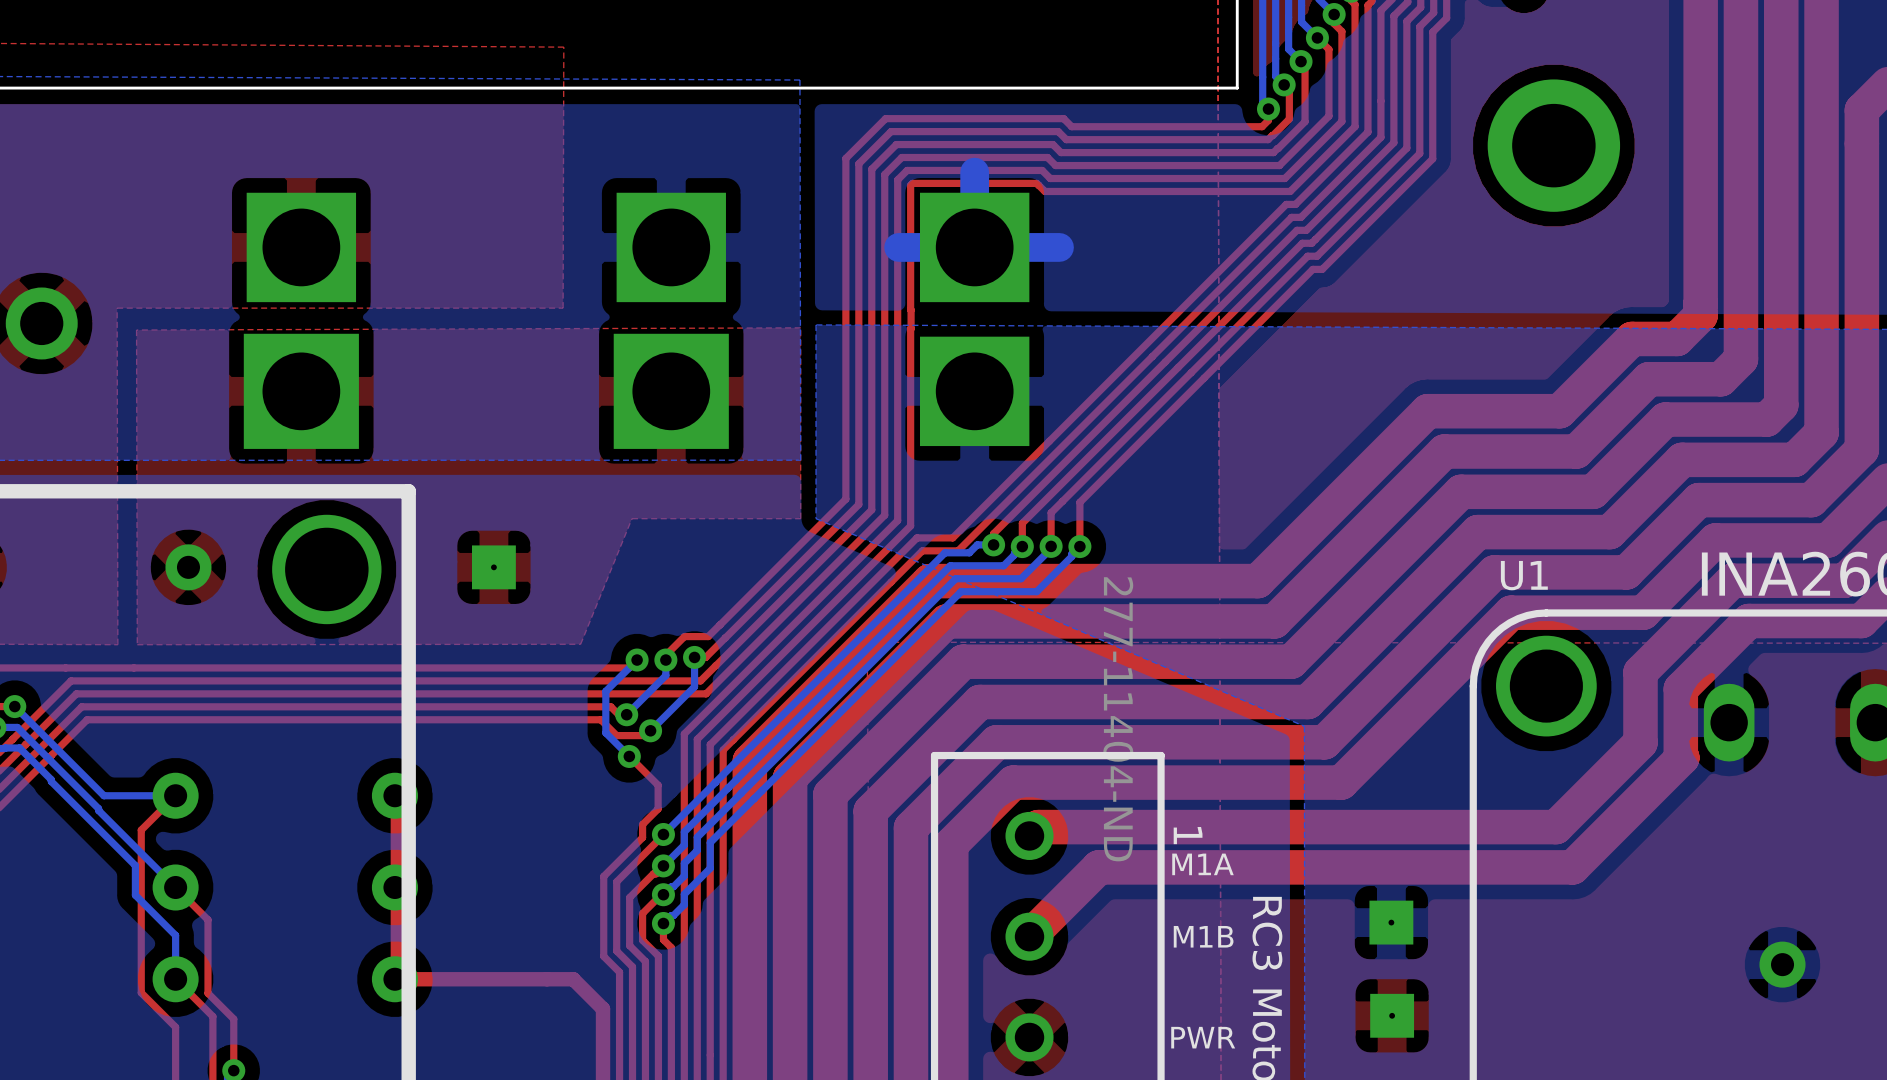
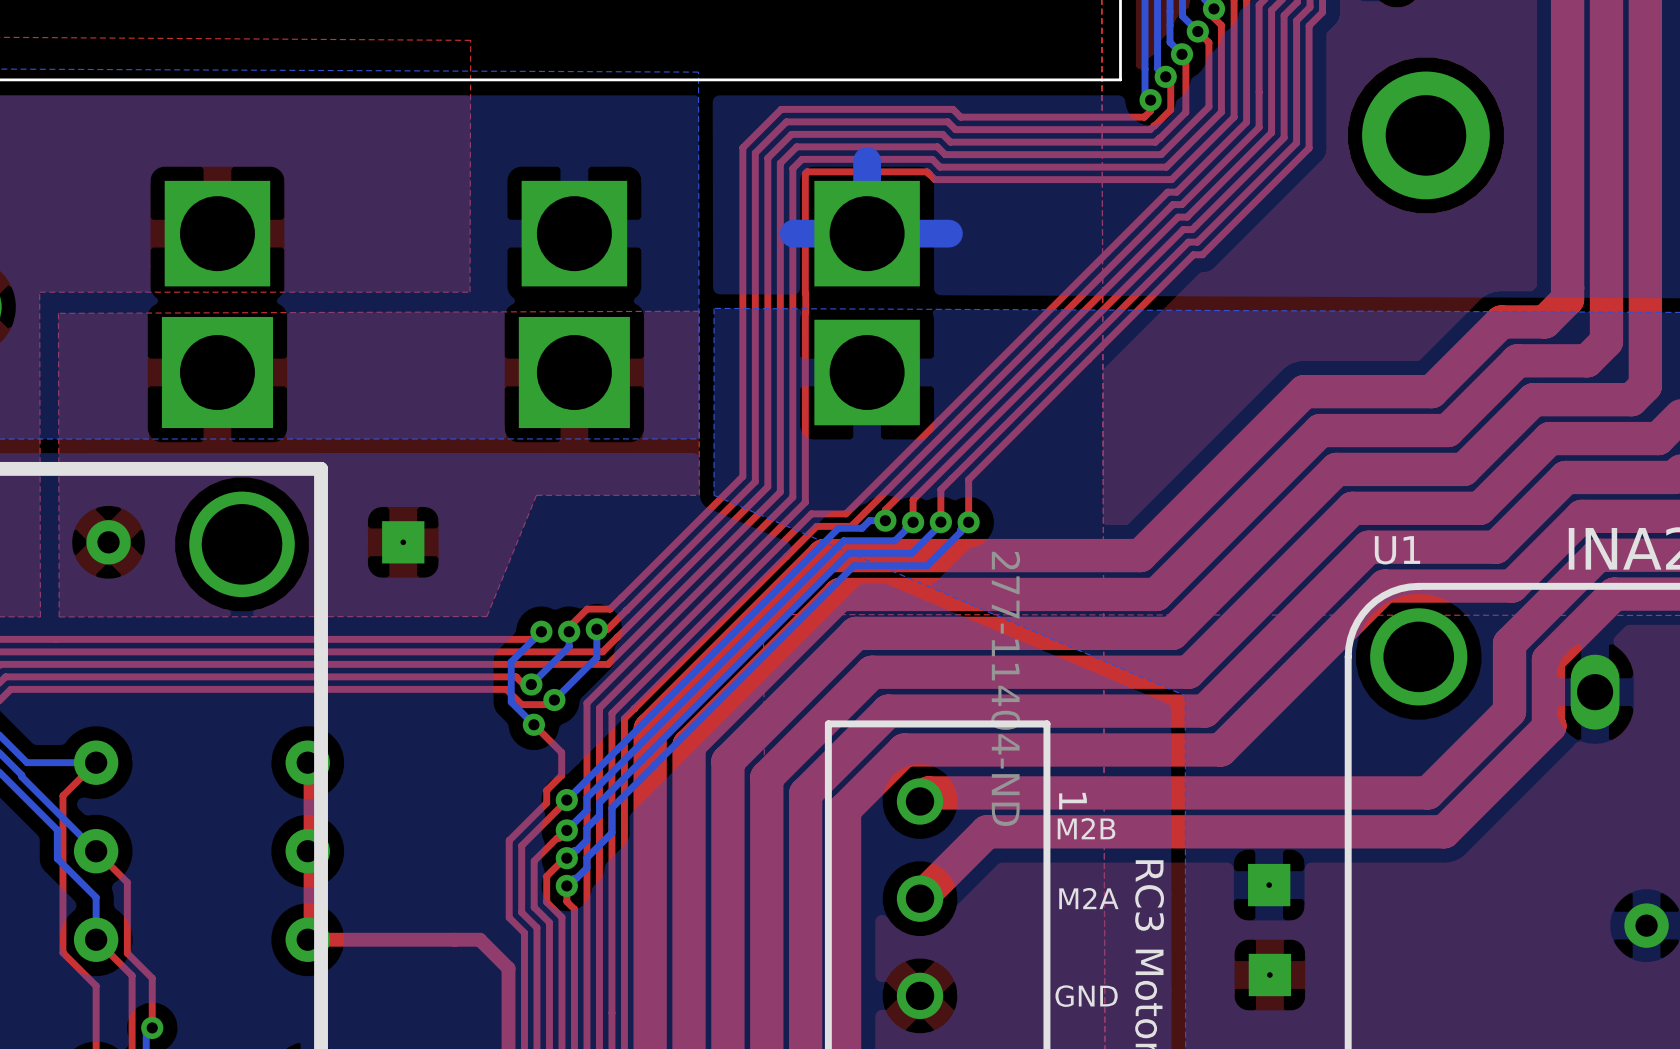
text: M1A (1202, 864) -> M2B (1086, 828)
text: M1B (1203, 936) -> M2A (1088, 898)
text: PWR (1203, 1037) -> GND (1086, 996)

